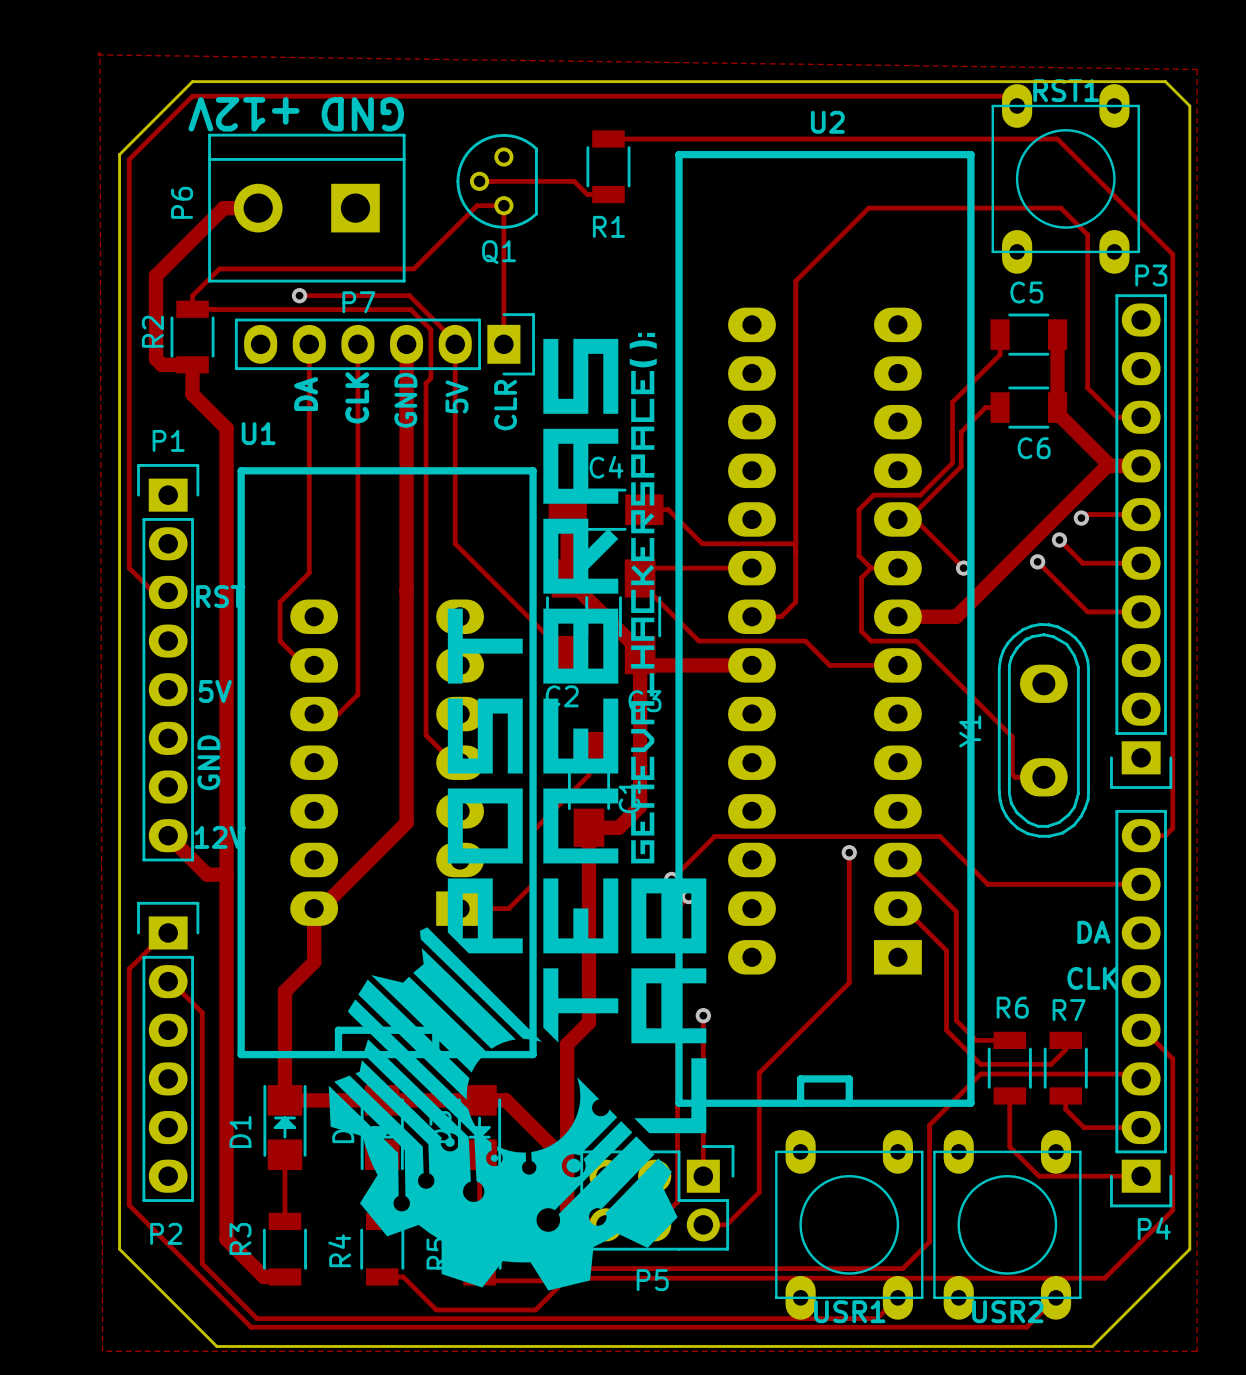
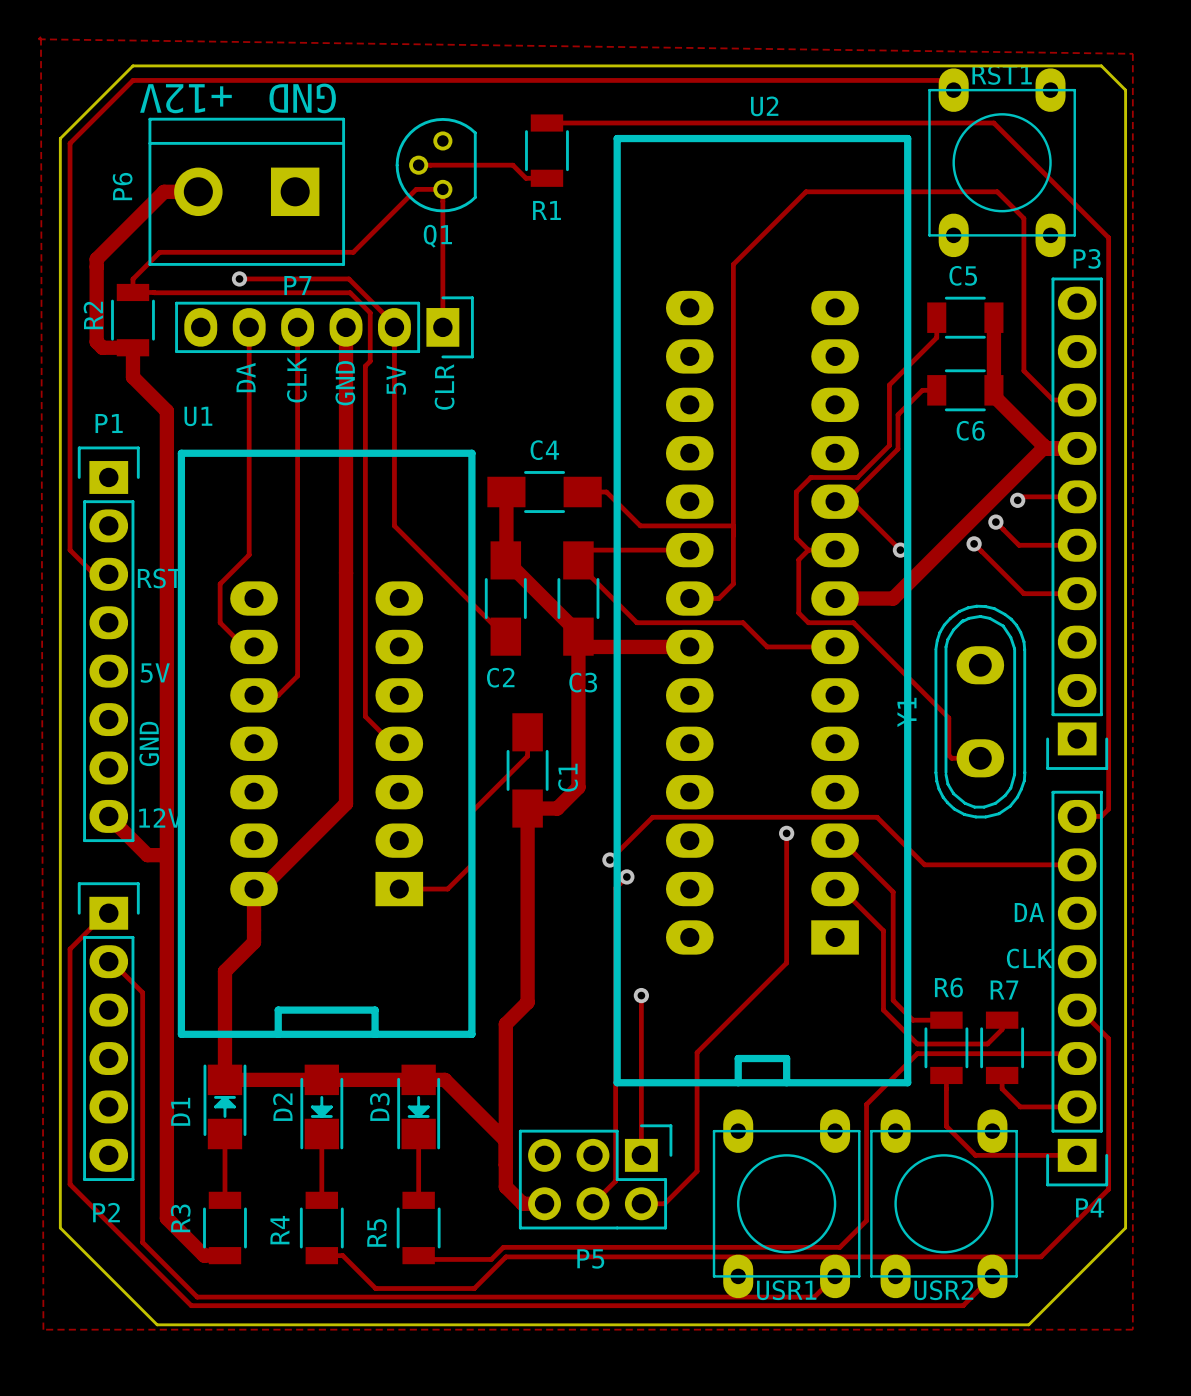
drawing: [328, 332, 707, 1291] -> none

